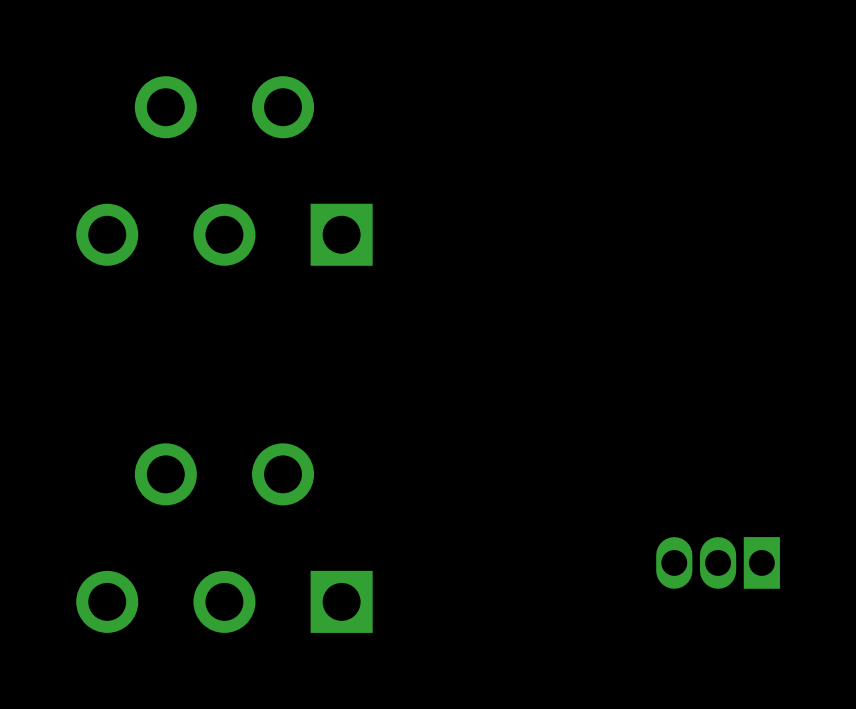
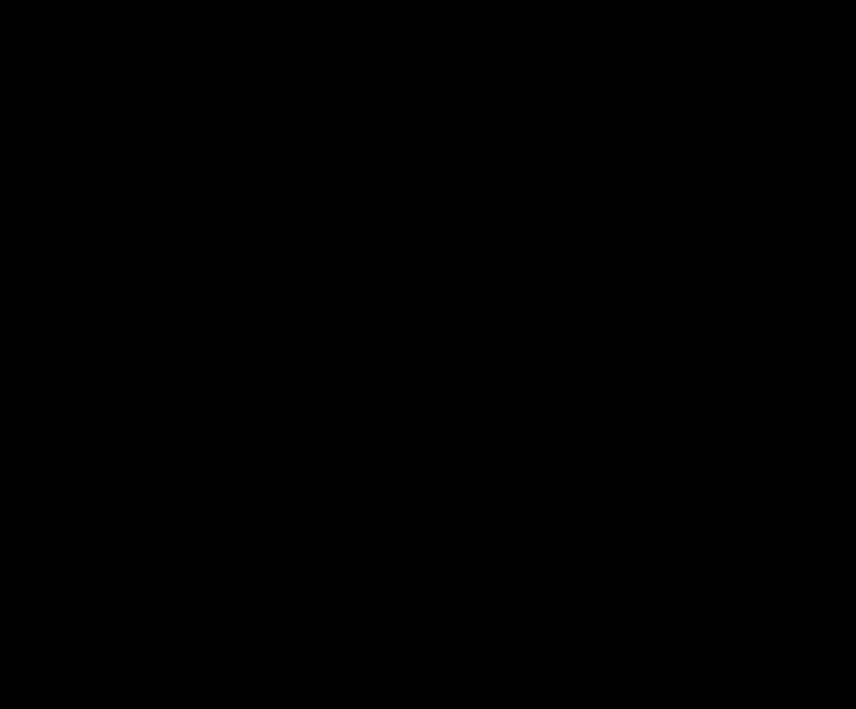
part: (224, 171) -> none
part: (224, 538) -> none
part: (718, 562) -> none

